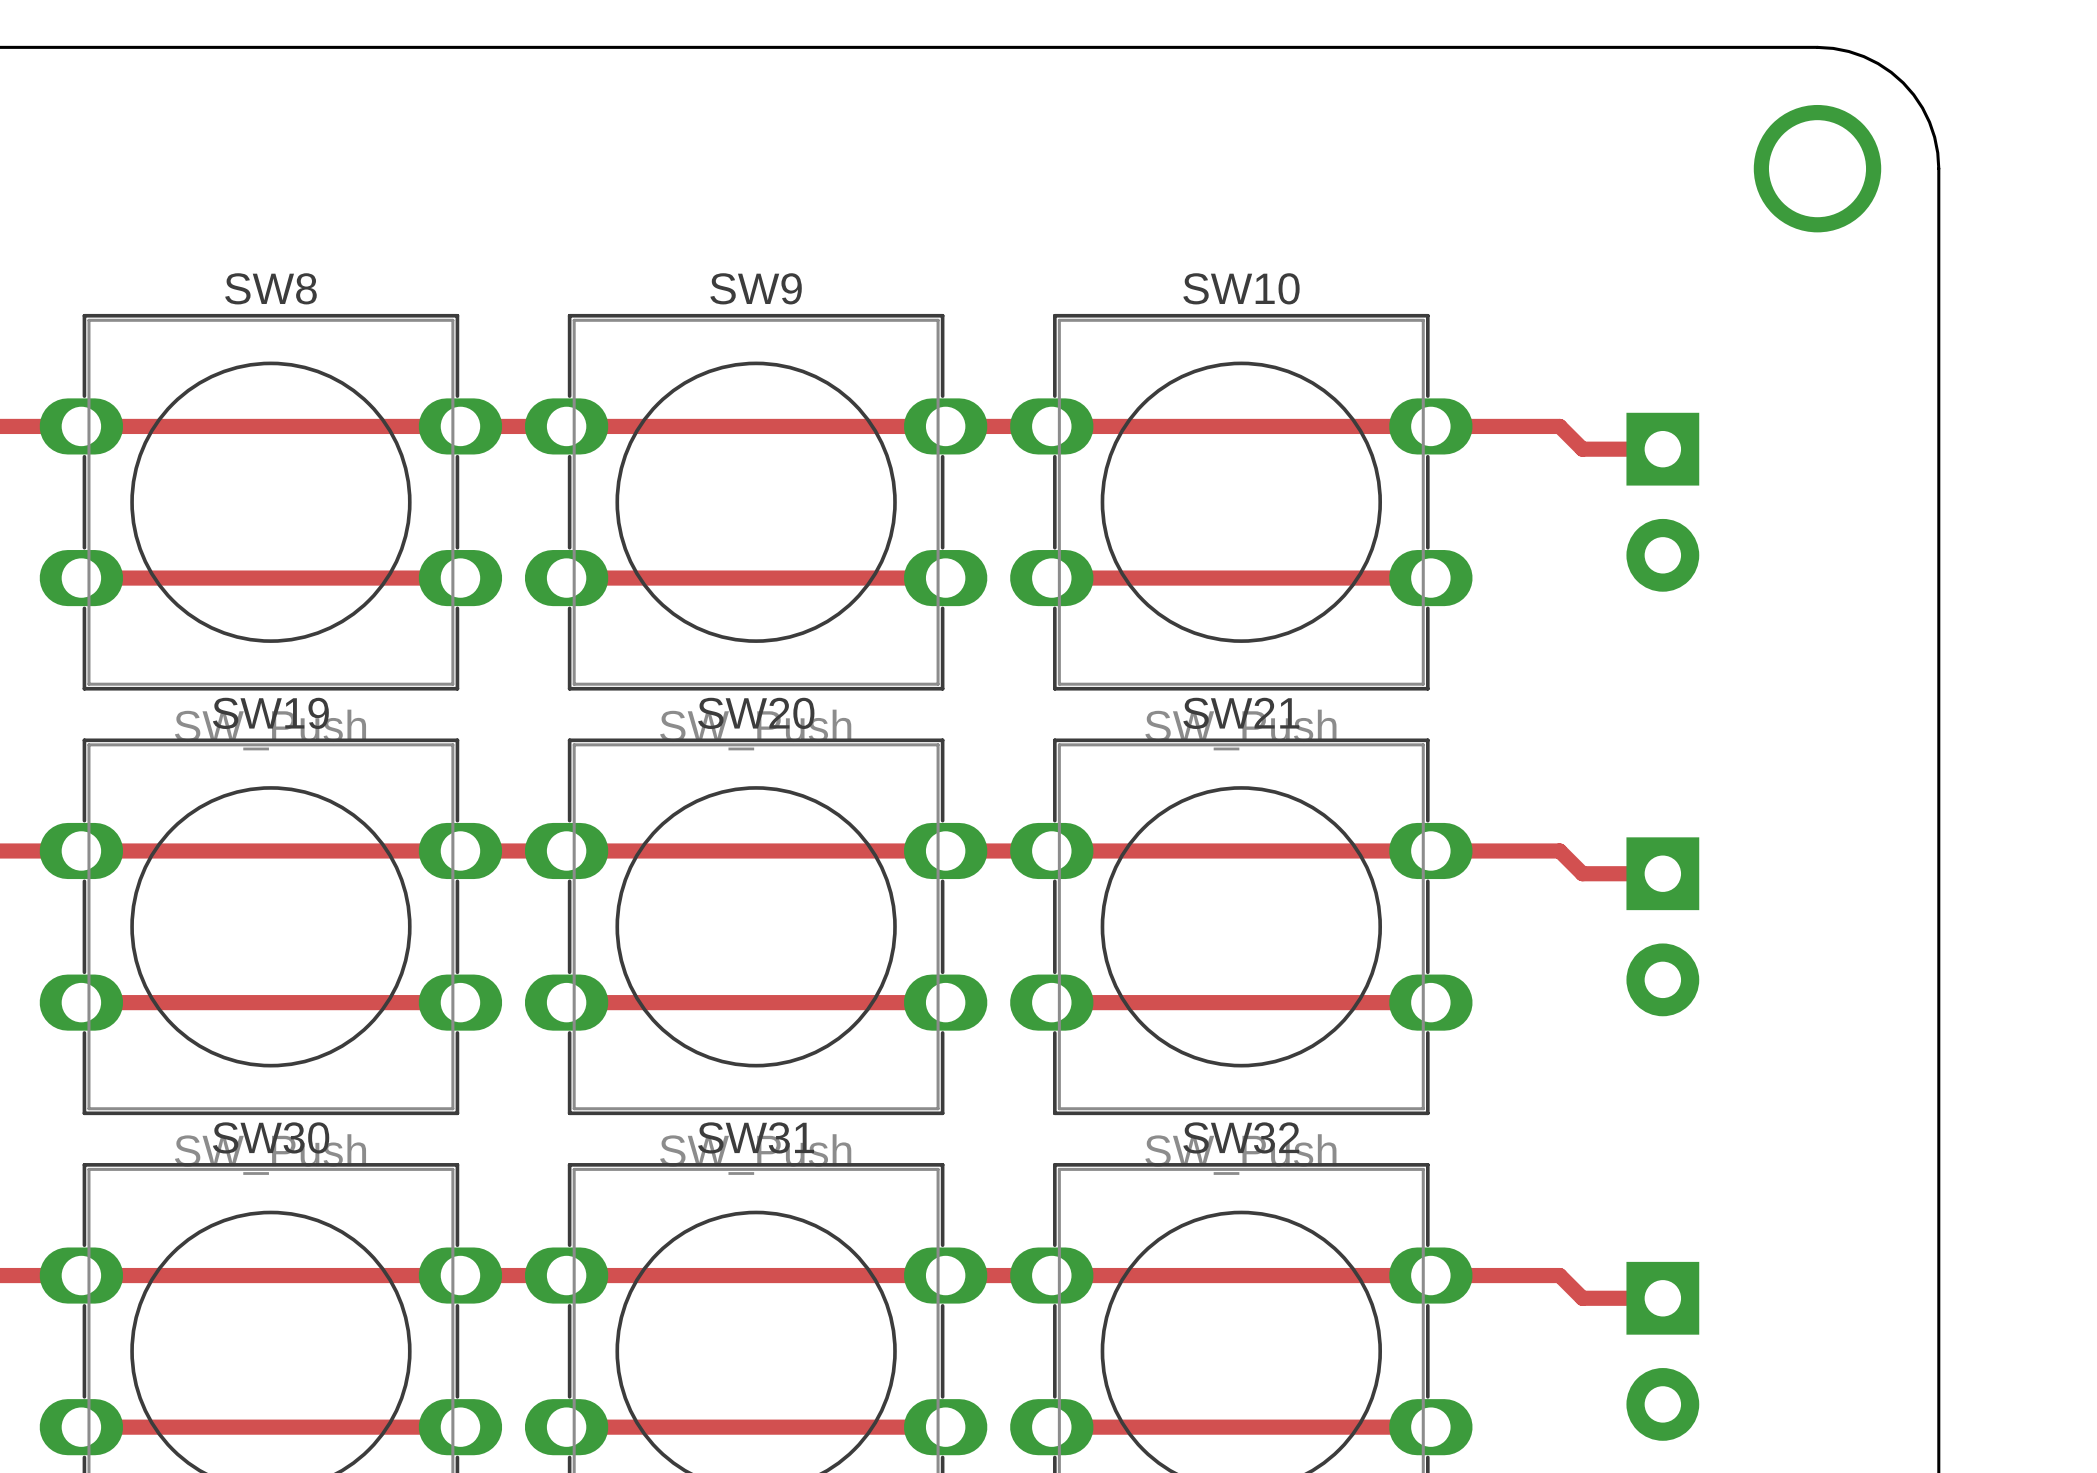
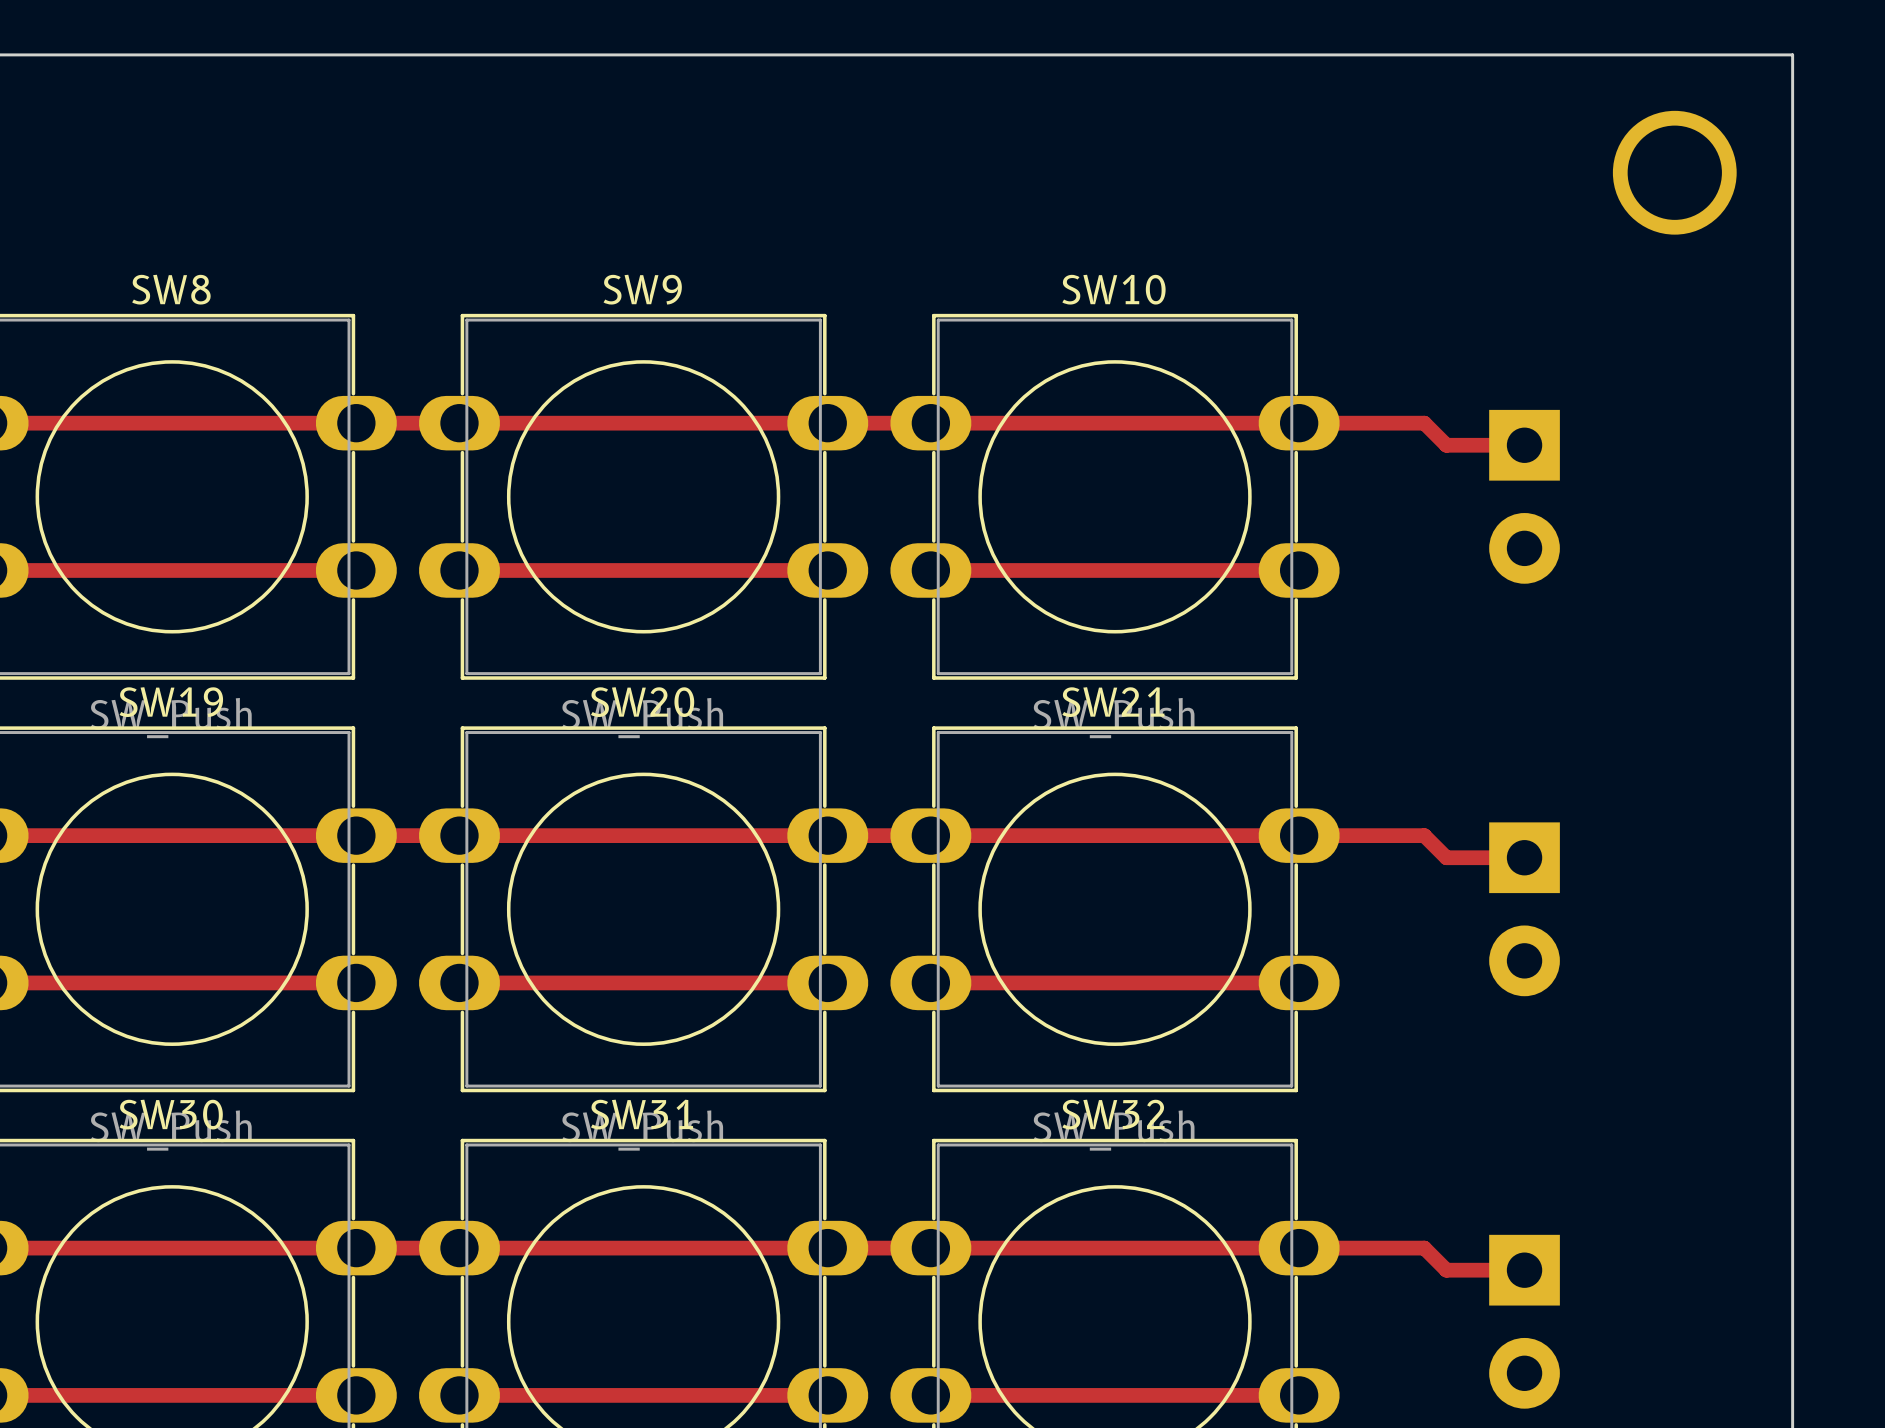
board edge: (1817, 47) (1833, 48) (1863, 56) (1891, 72) (1903, 82) (1913, 94) (1929, 122) (1934, 137) (1938, 168) -> (1674, 54) (1792, 54) (1792, 172)

